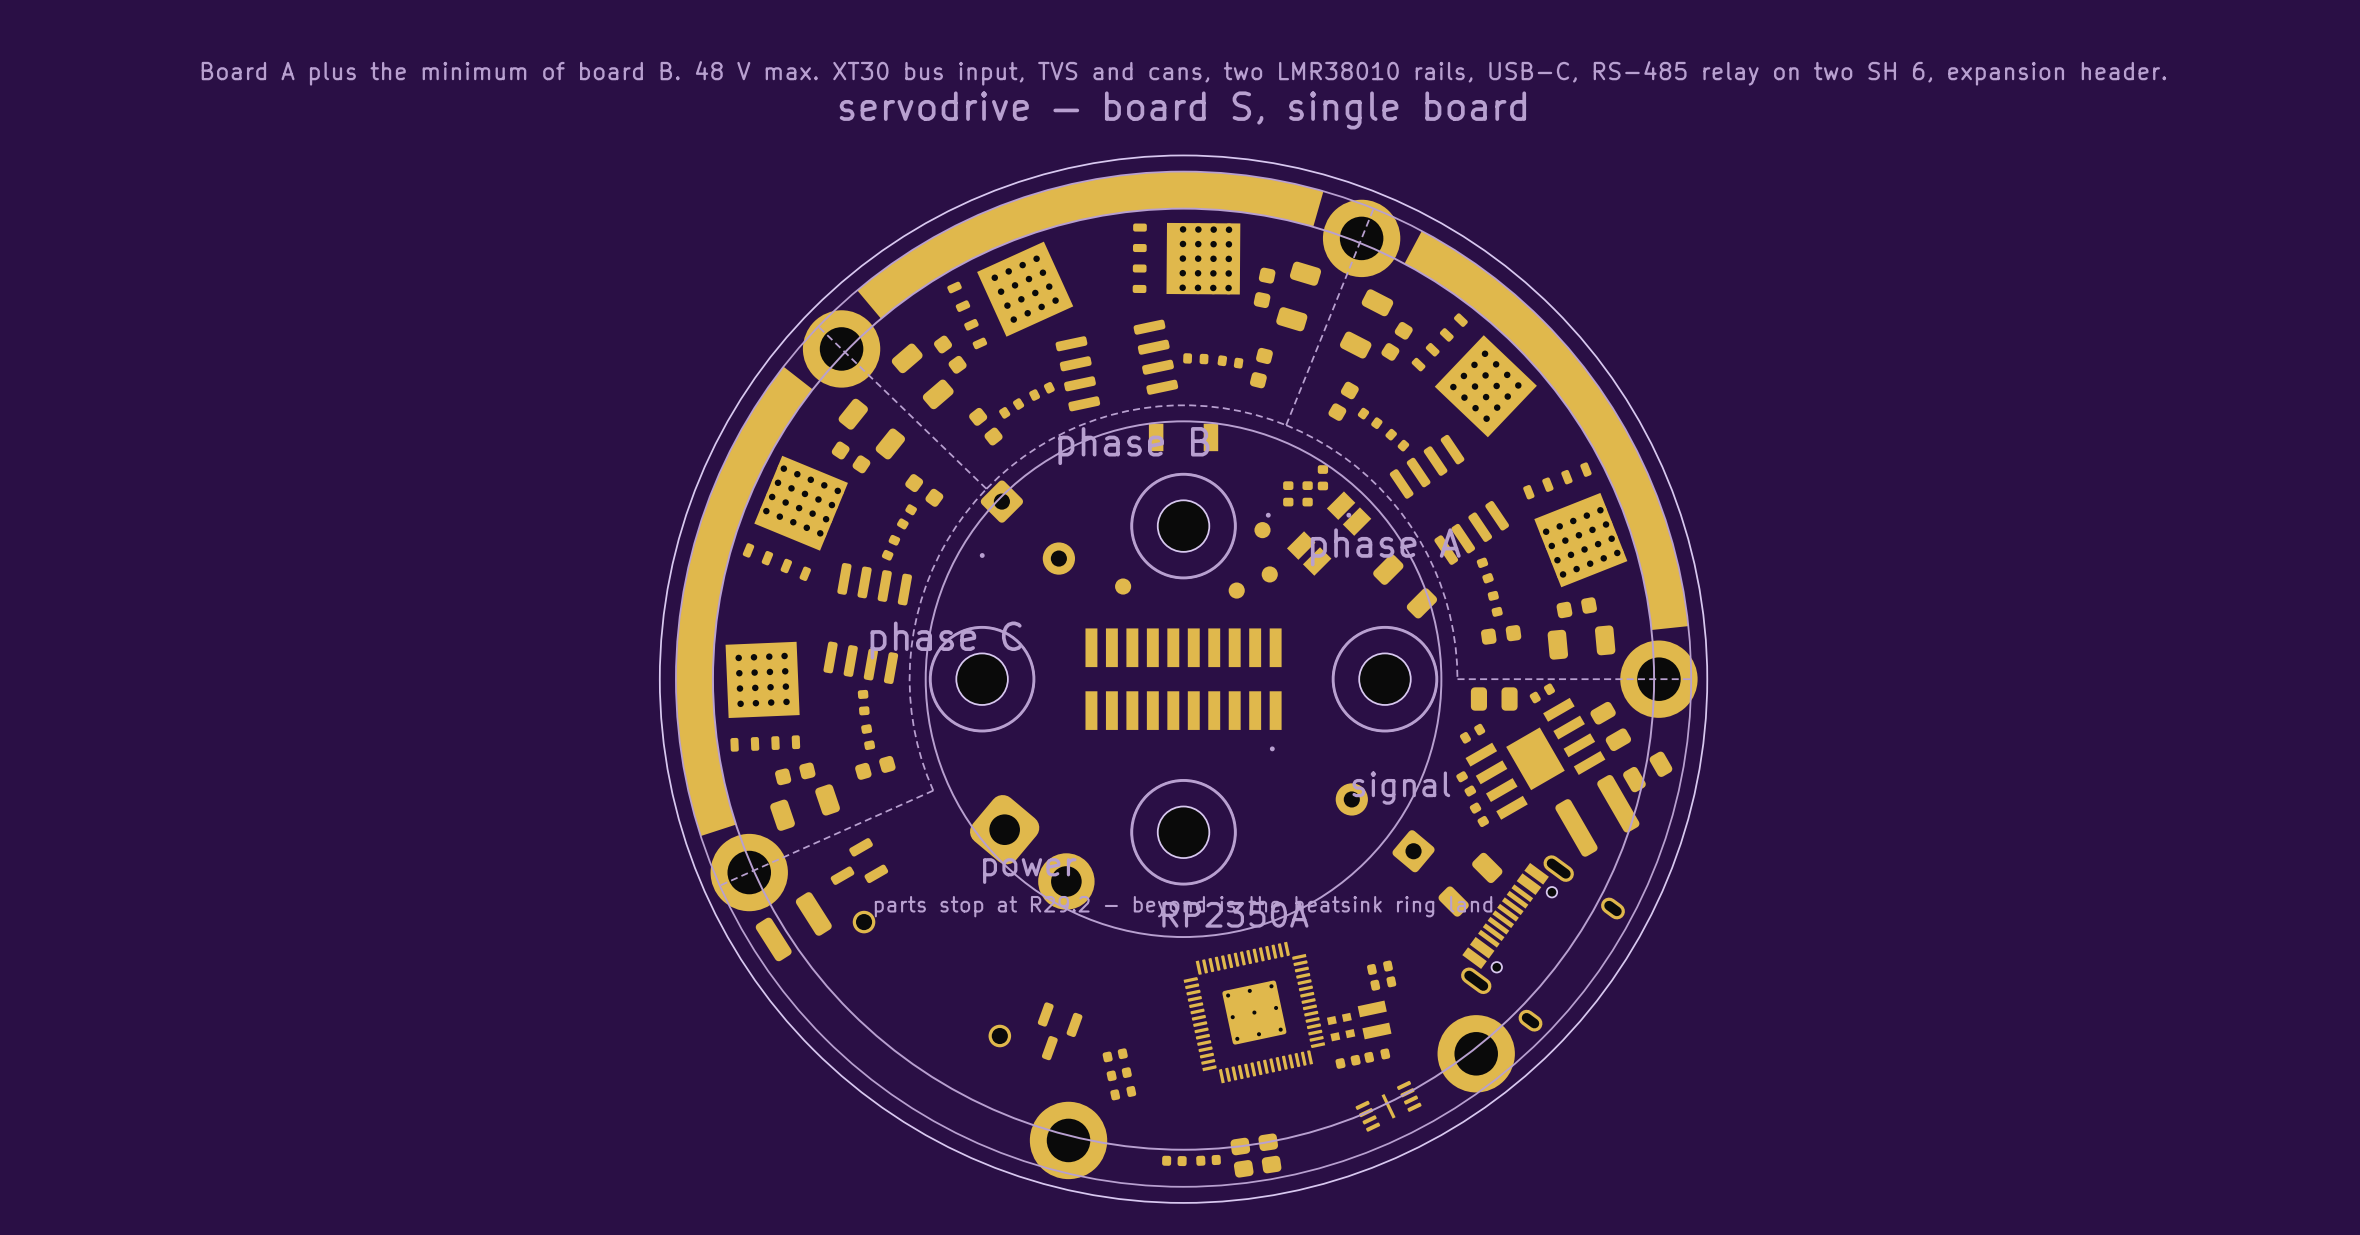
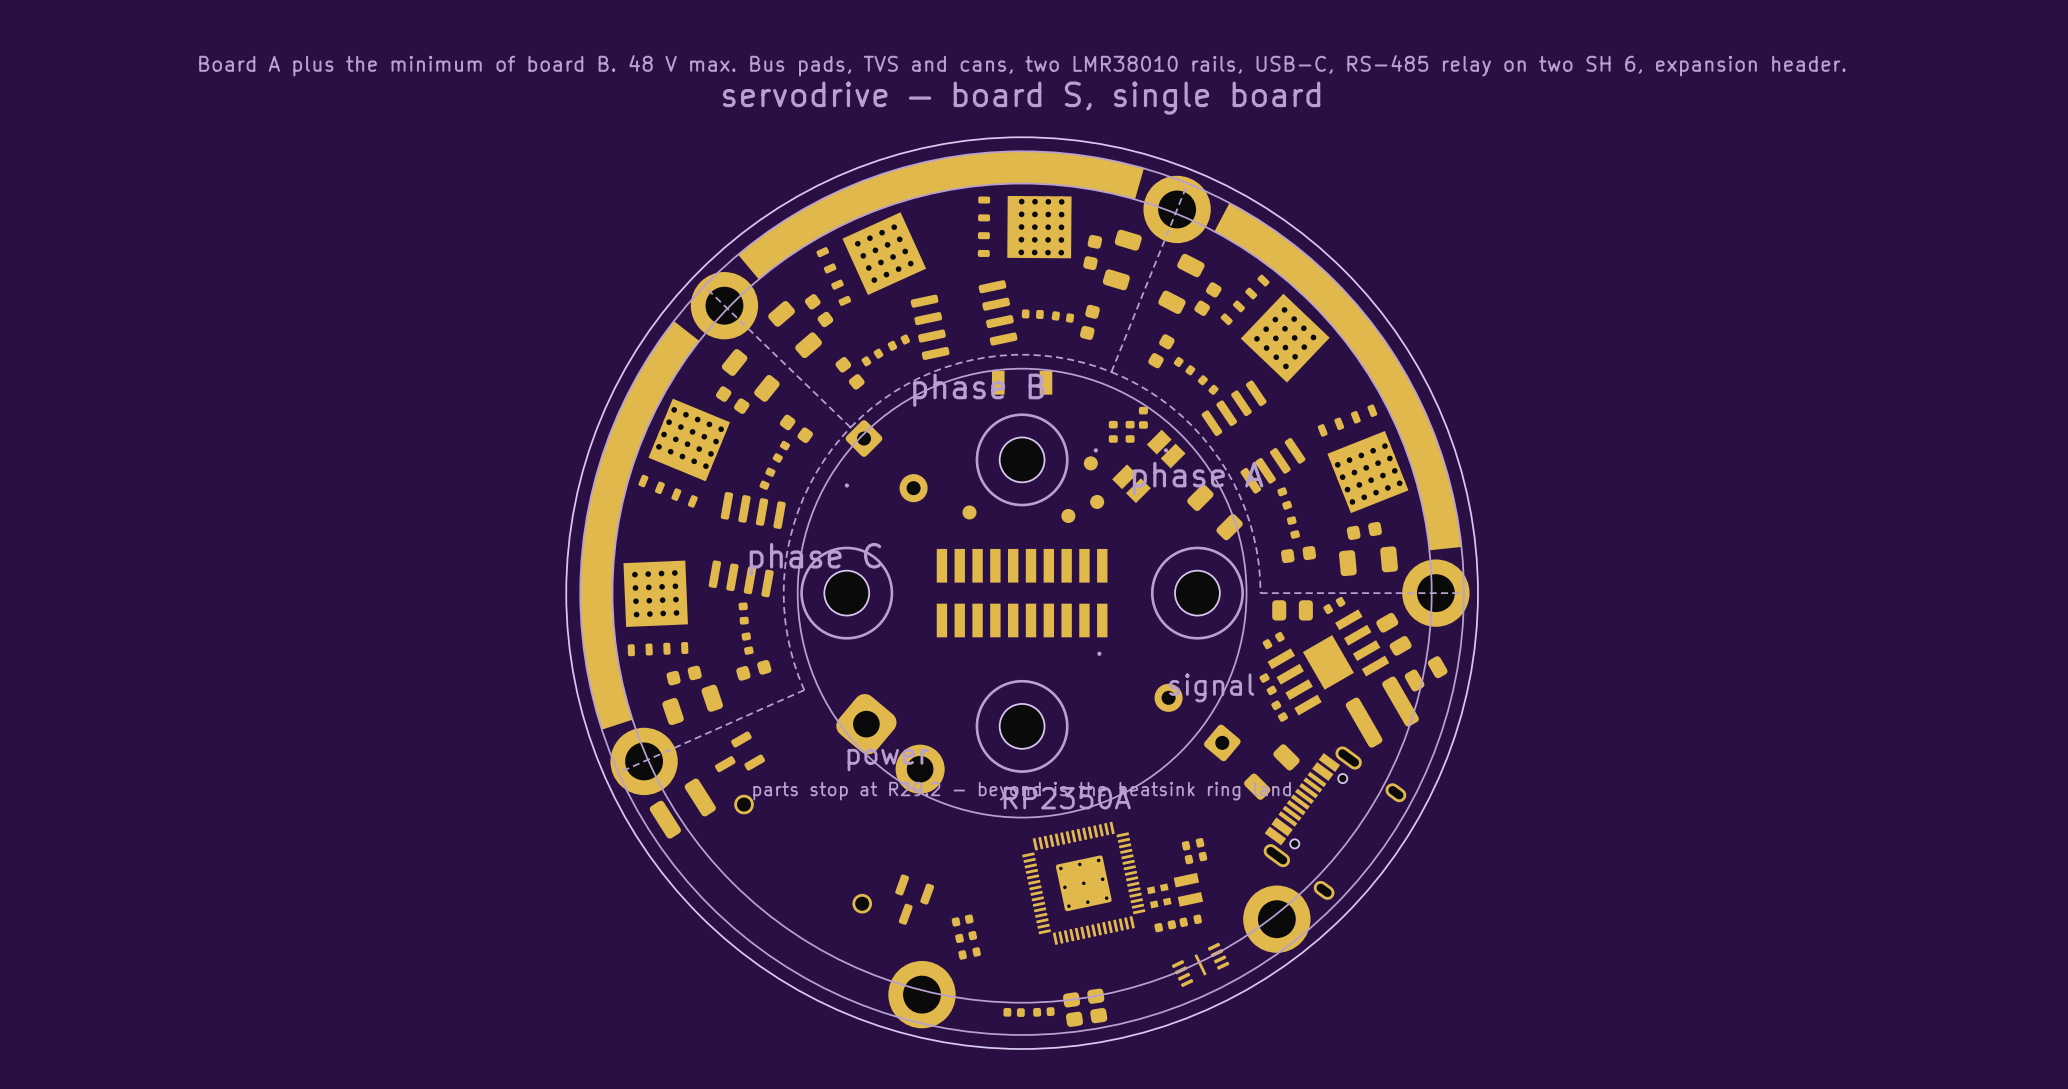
text: Board A plus the minimum of board B. 48 V max. XT30 bus input, TVS and cans, two LMR38010 rails, USB-C, RS-485 relay on two SH 6, expansion header. (1183, 73) -> Board A plus the minimum of board B. 48 V max. Bus pads, TVS and cans, two LMR38010 rails, USB-C, RS-485 relay on two SH 6, expansion header. (1022, 65)

